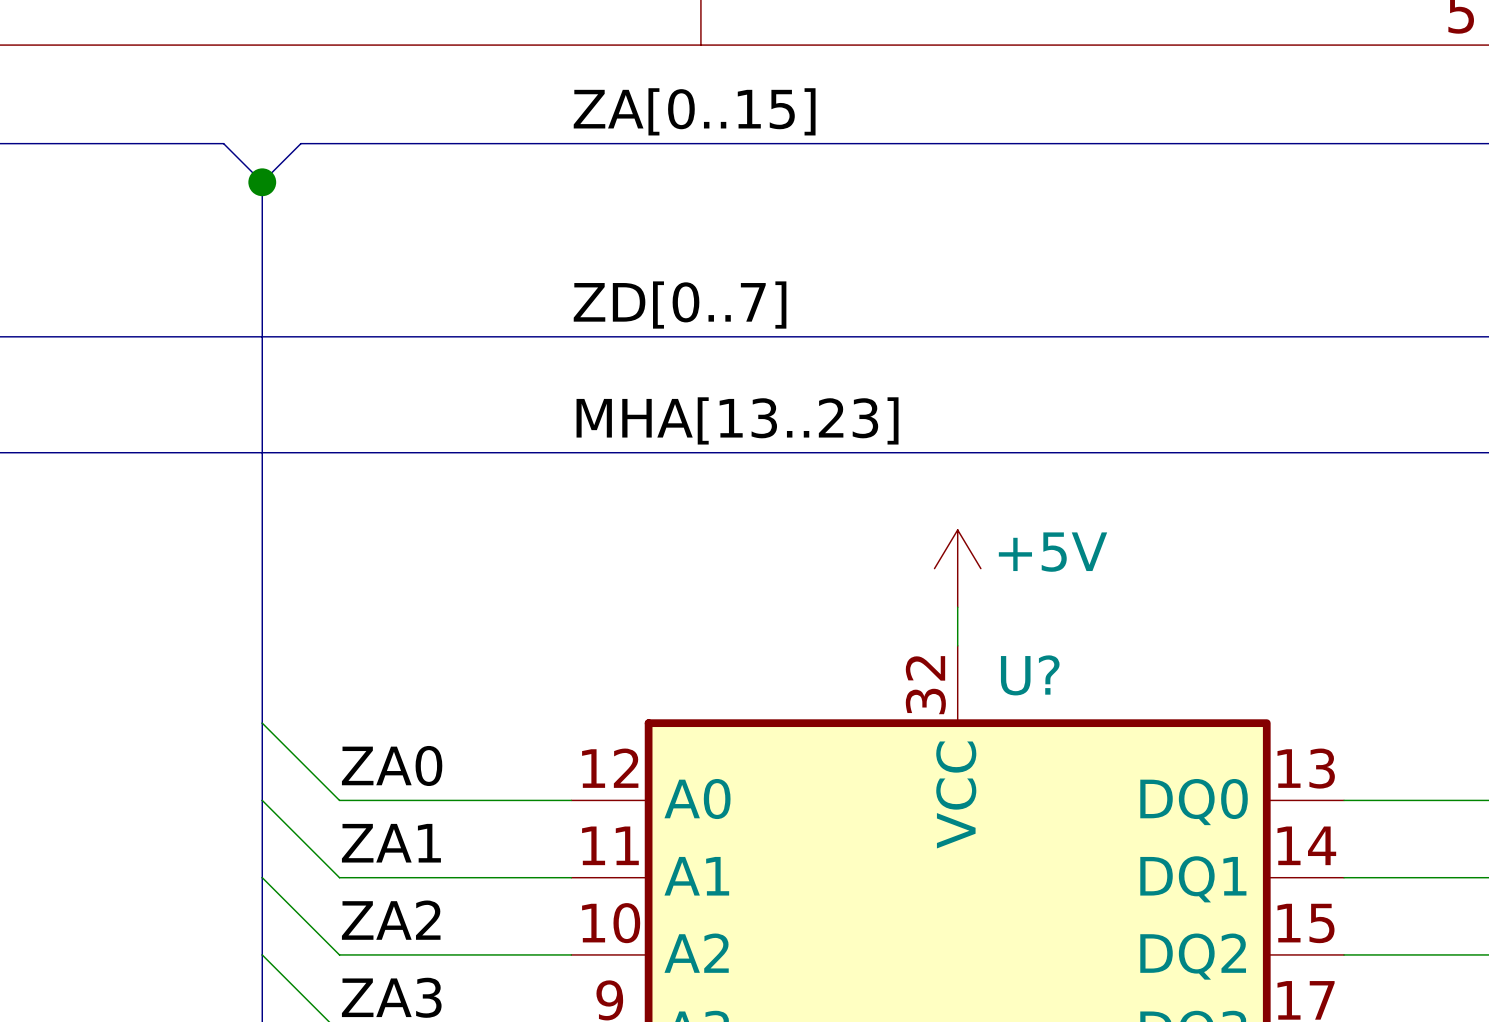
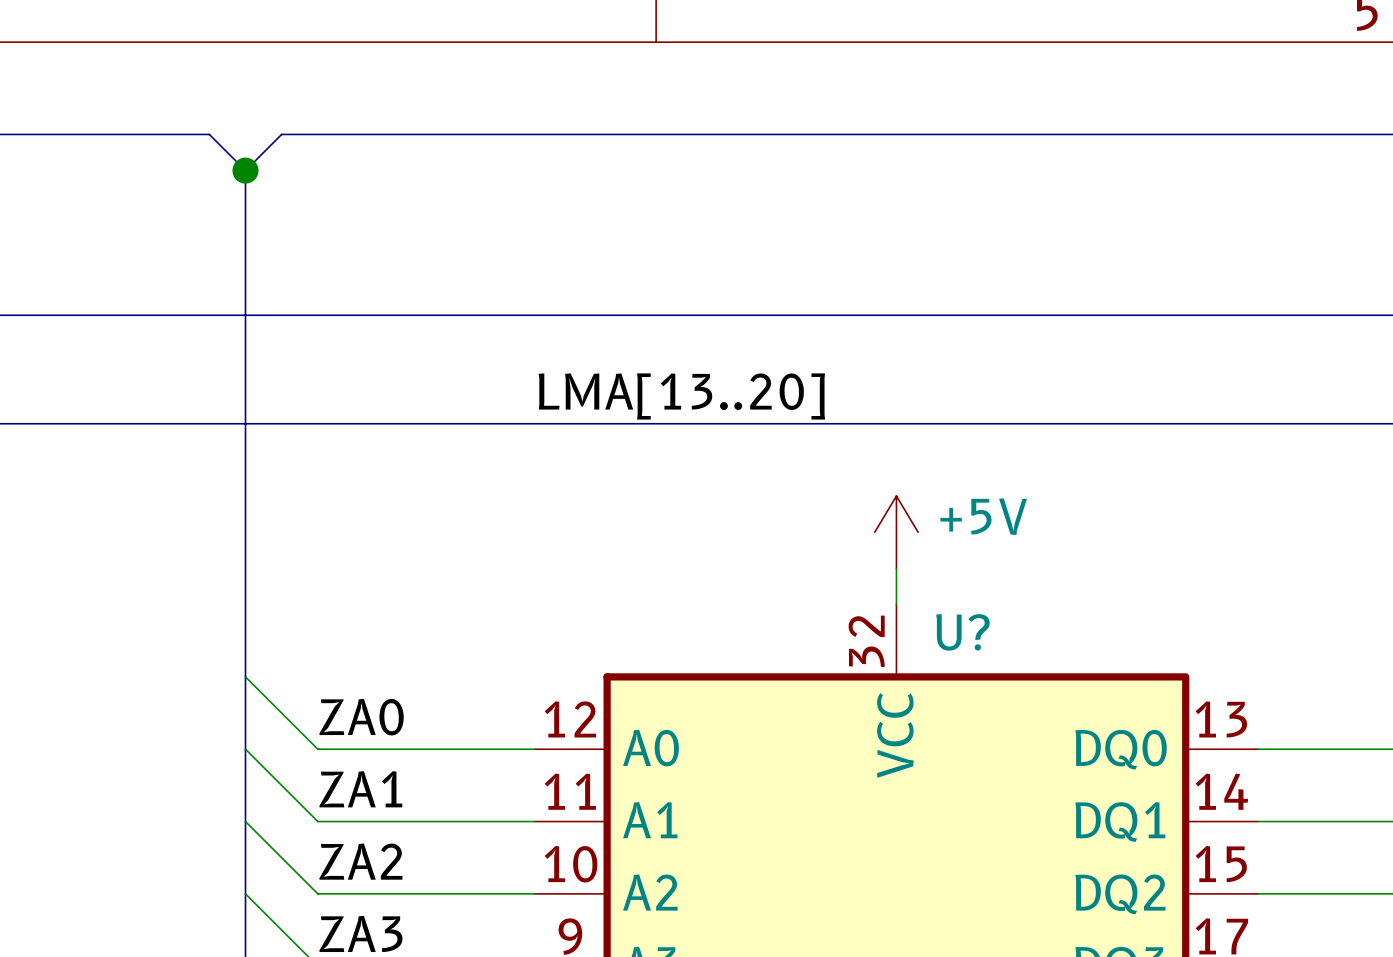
label: ZA[0..15] (694, 111) -> none
label: ZD[0..7] (680, 305) -> none
label: MHA[13..23] (737, 420) -> LMA[13..20] (681, 396)

